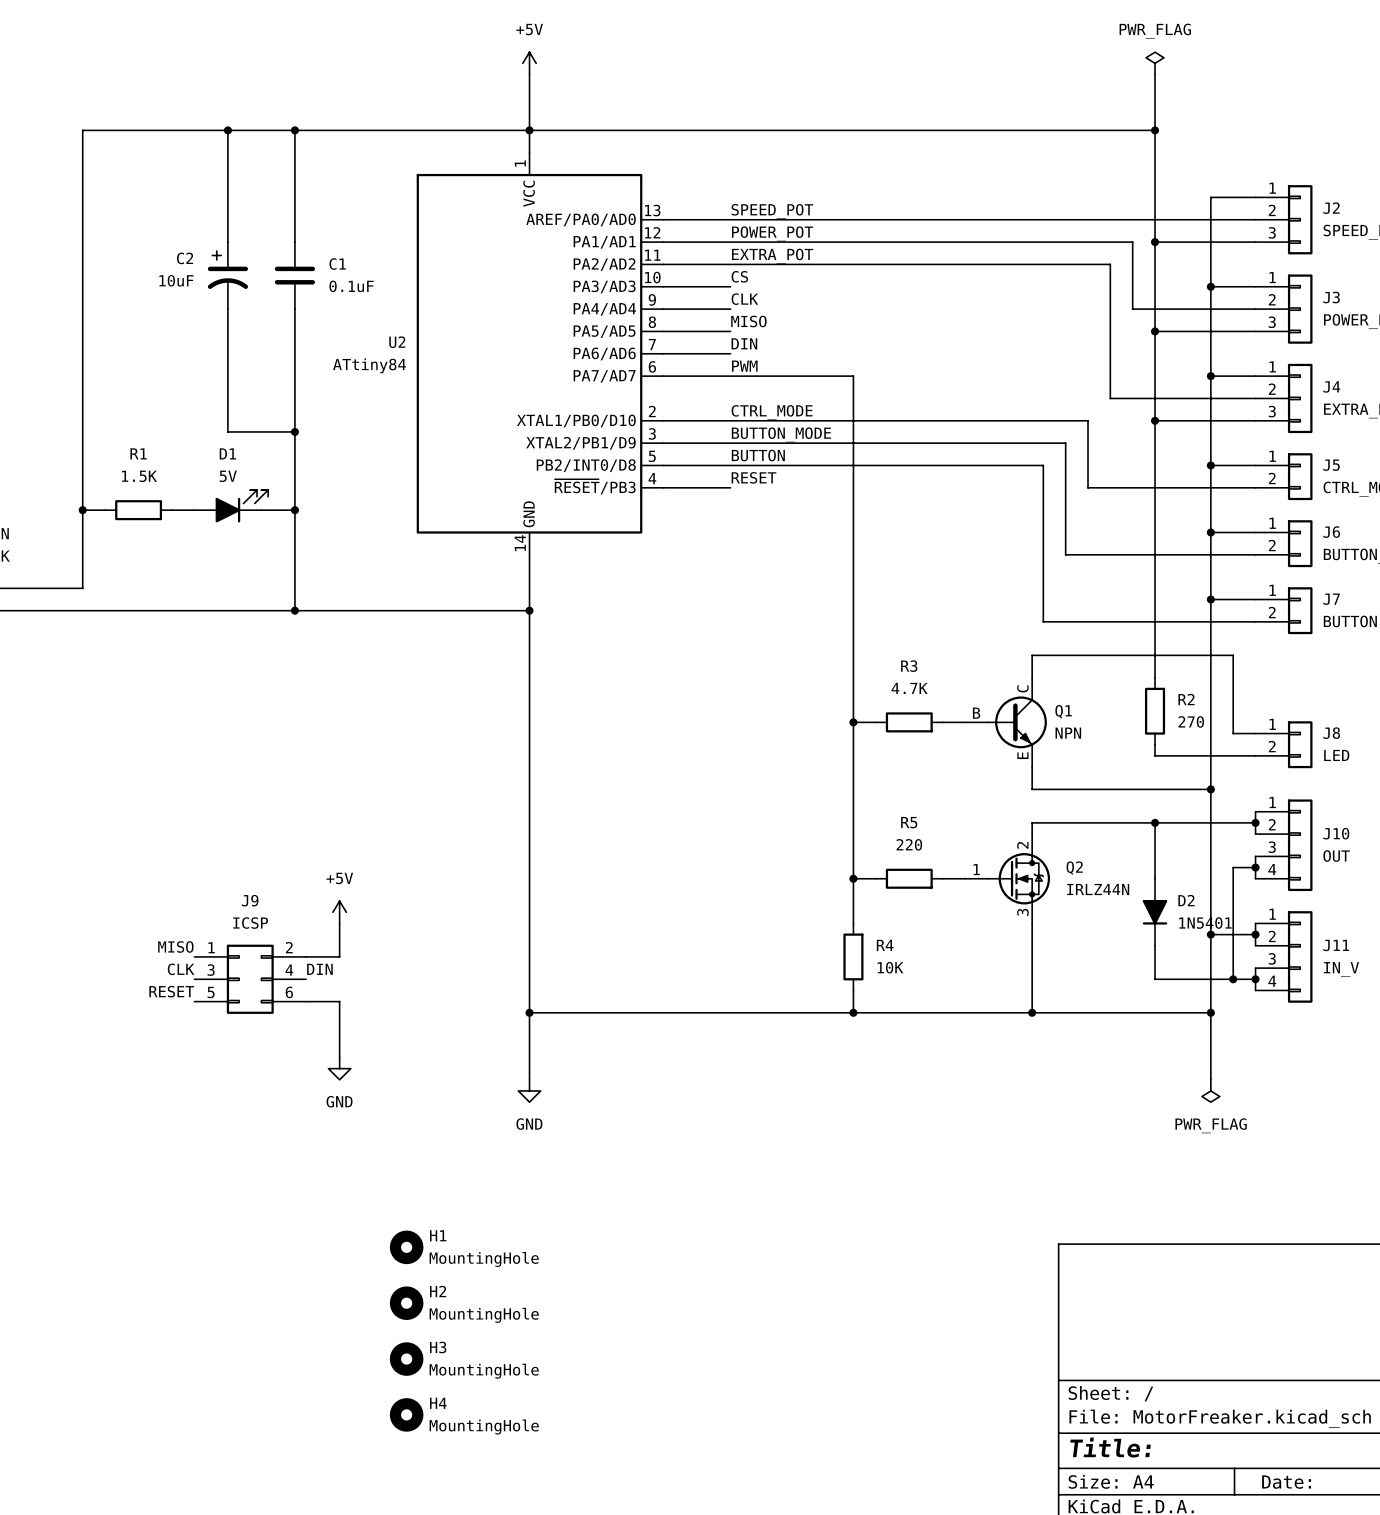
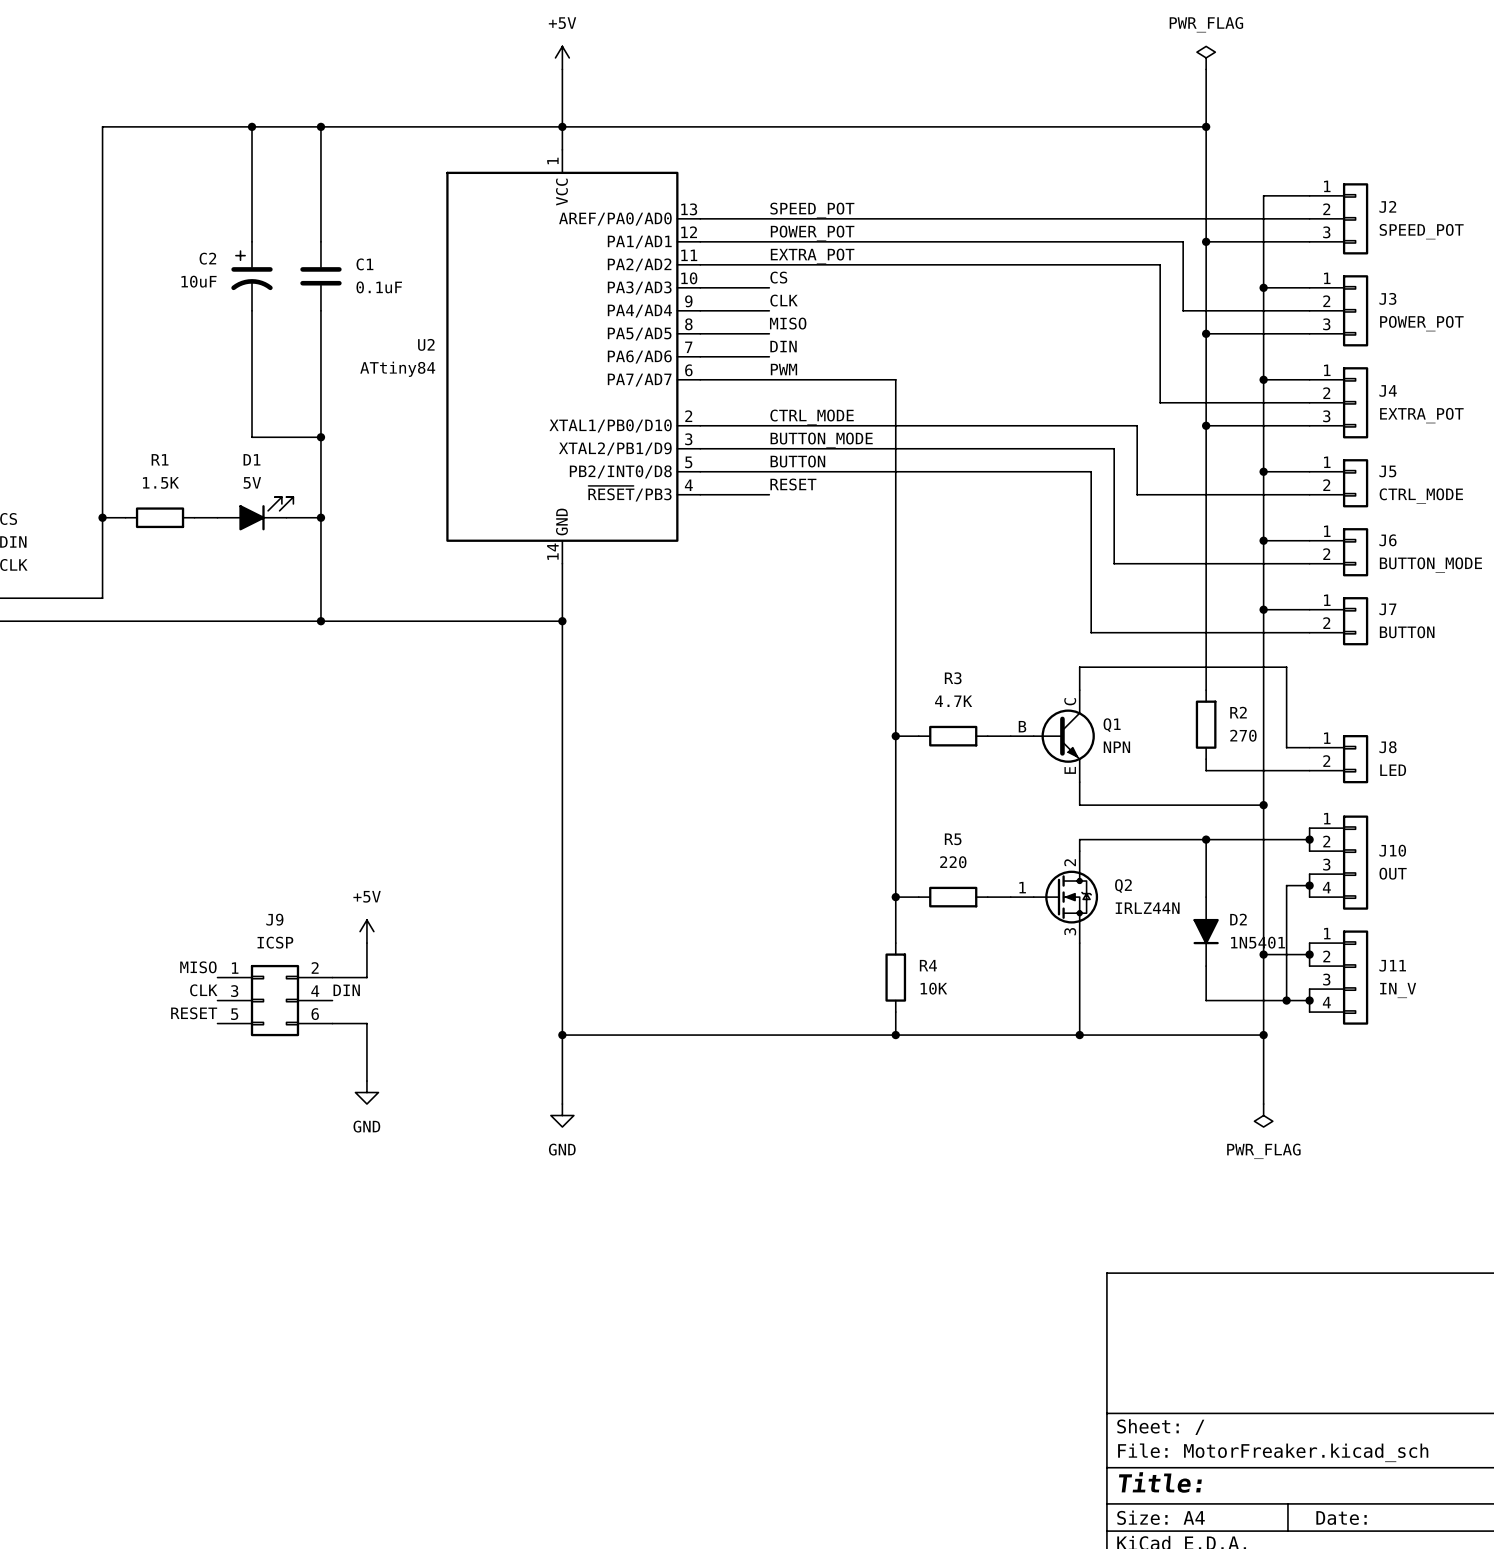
H1: MountingHole (406, 1247) -> none
H2: MountingHole (406, 1303) -> none
H3: MountingHole (406, 1359) -> none
H4: MountingHole (406, 1414) -> none

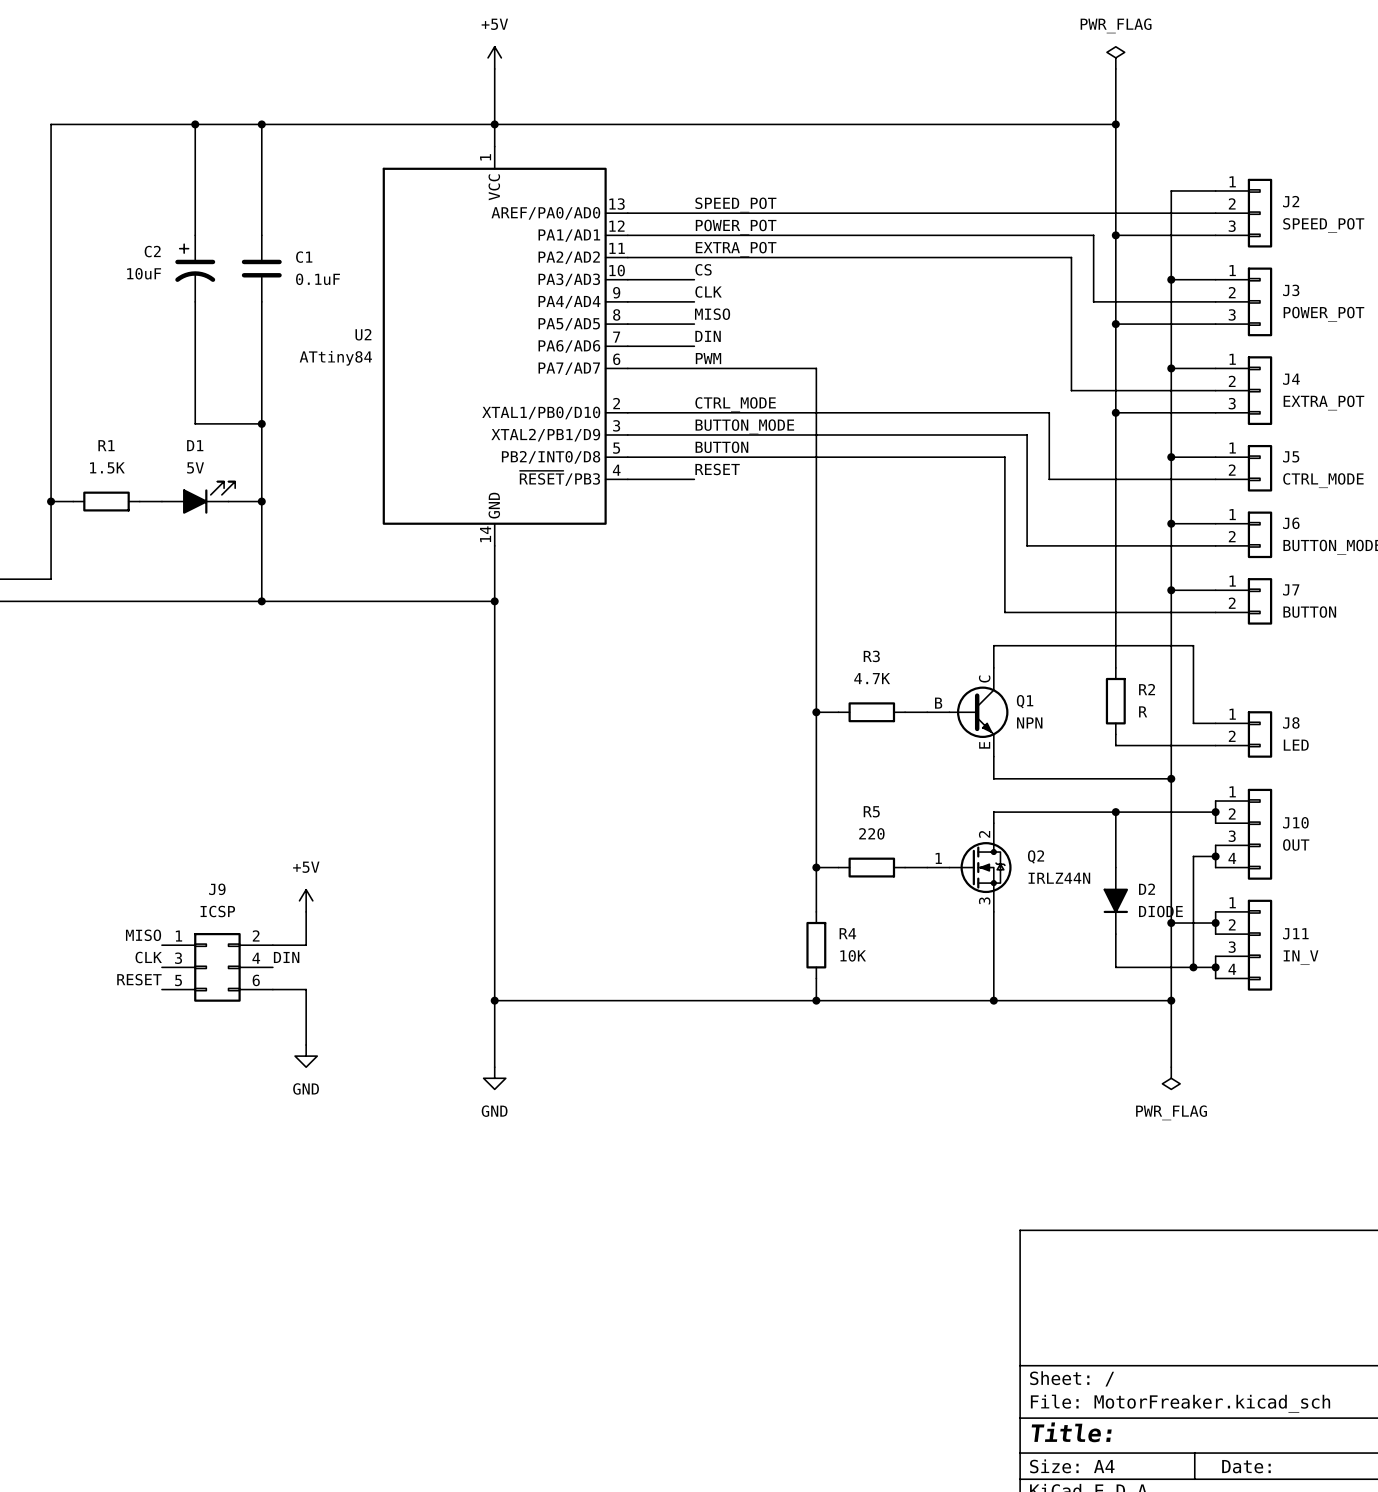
R2 value: 270 (1243, 735) -> R (1143, 711)
D2 value: 1N5401 (1258, 942) -> DIODE (1160, 911)

